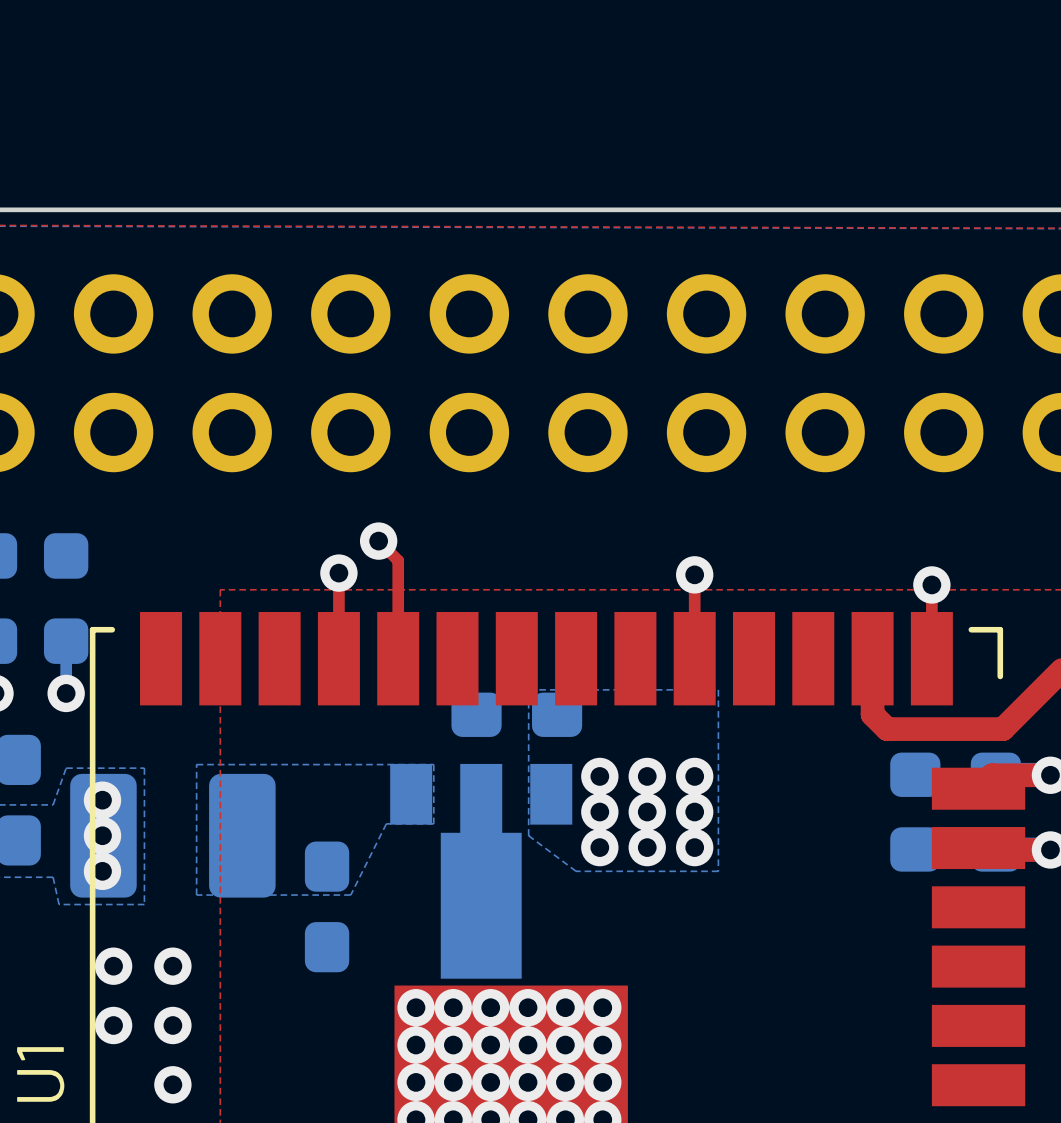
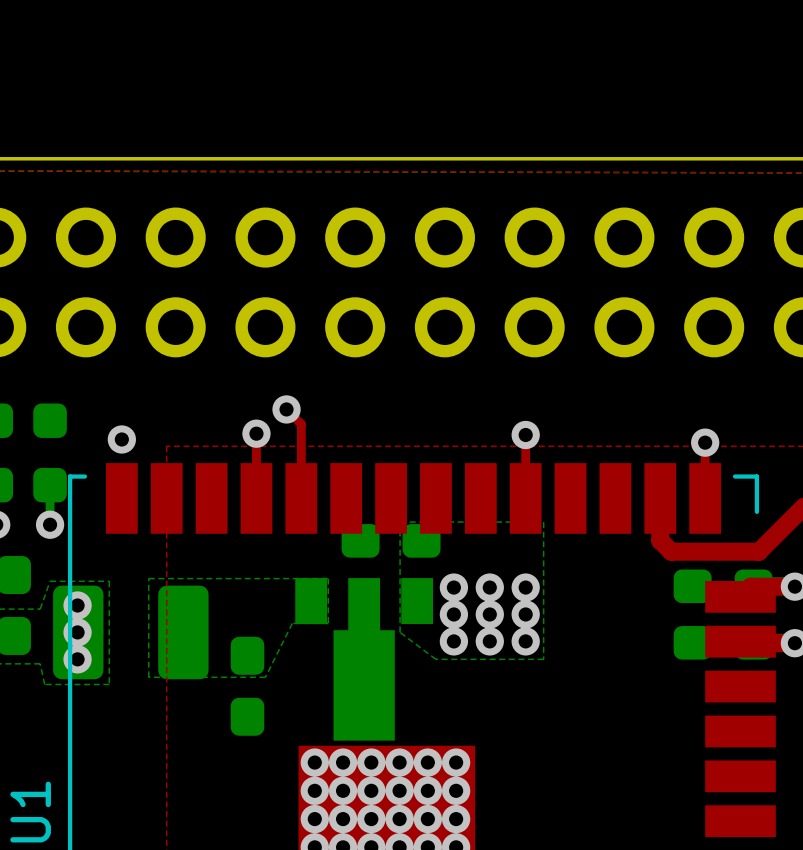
via: none -> (121, 439)
via: (113, 966) -> none
via: (172, 966) -> none
via: (113, 1025) -> none
via: (172, 1025) -> none
via: (172, 1084) -> none

